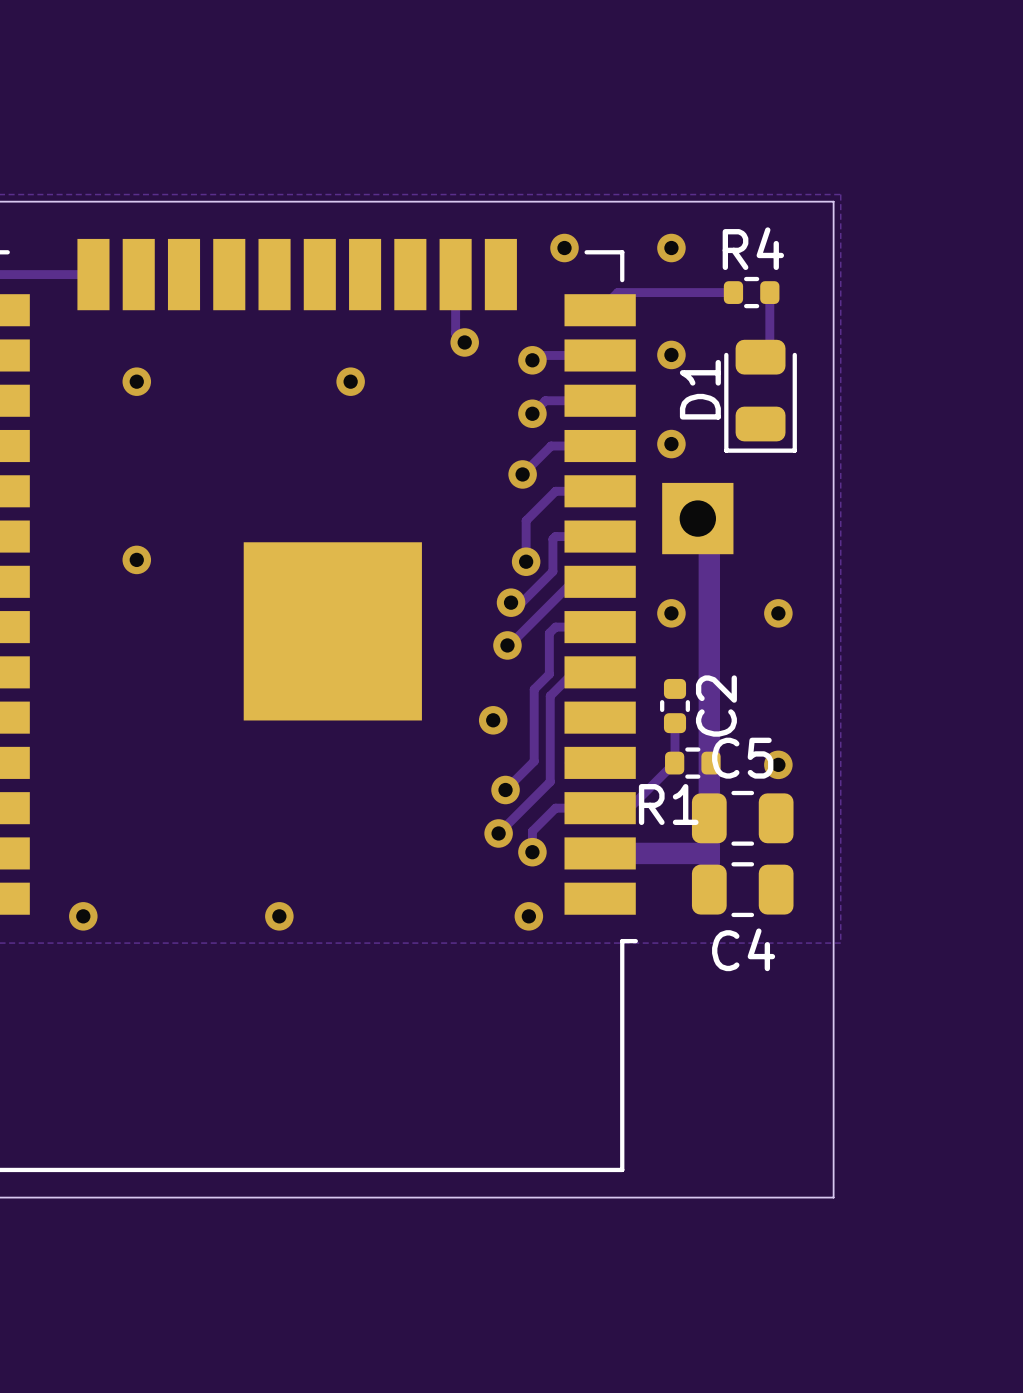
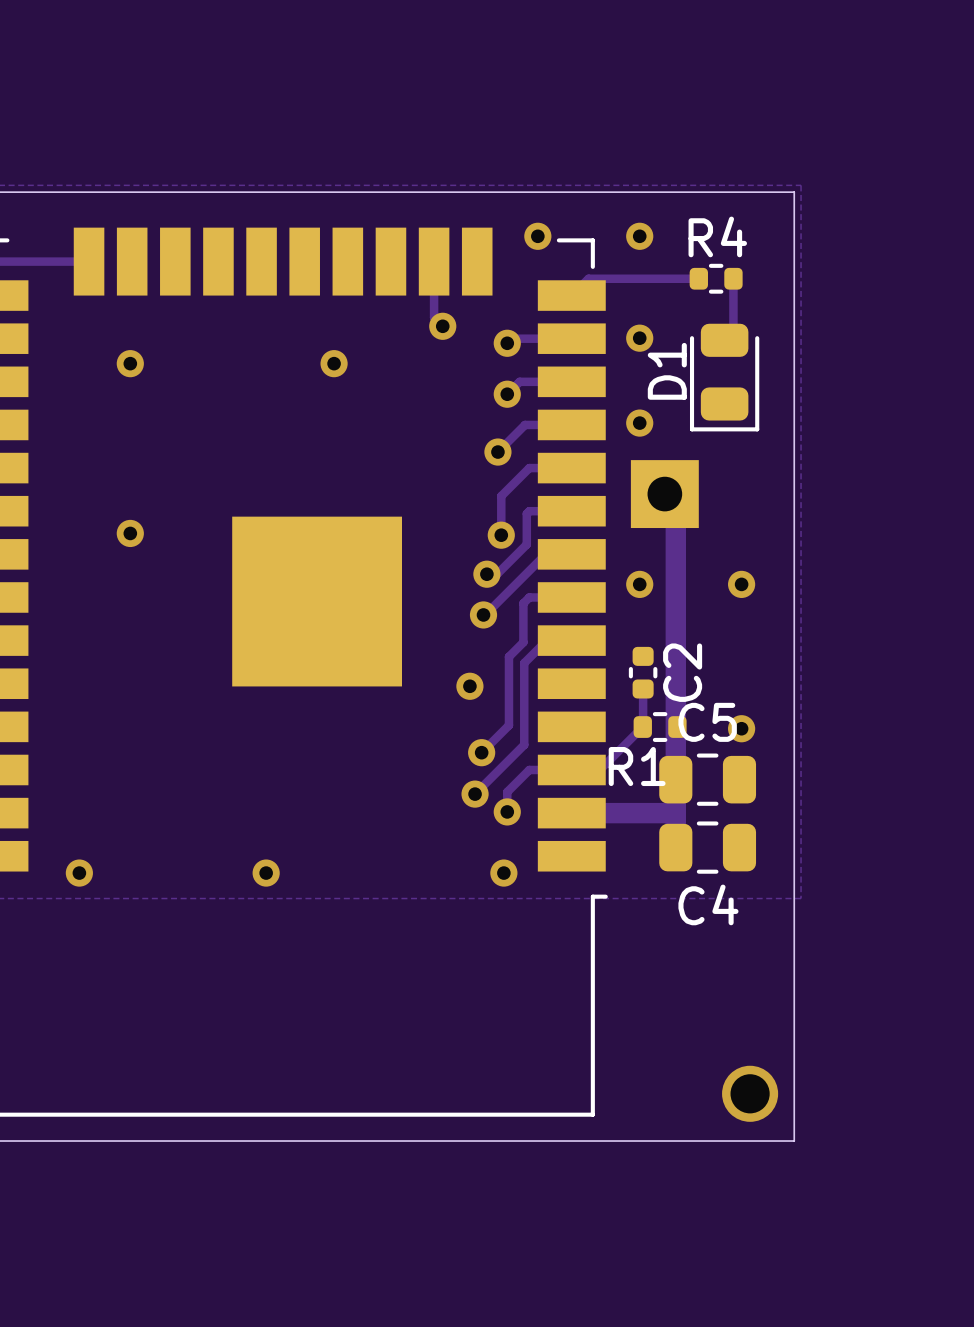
via: none -> (750, 1093)

